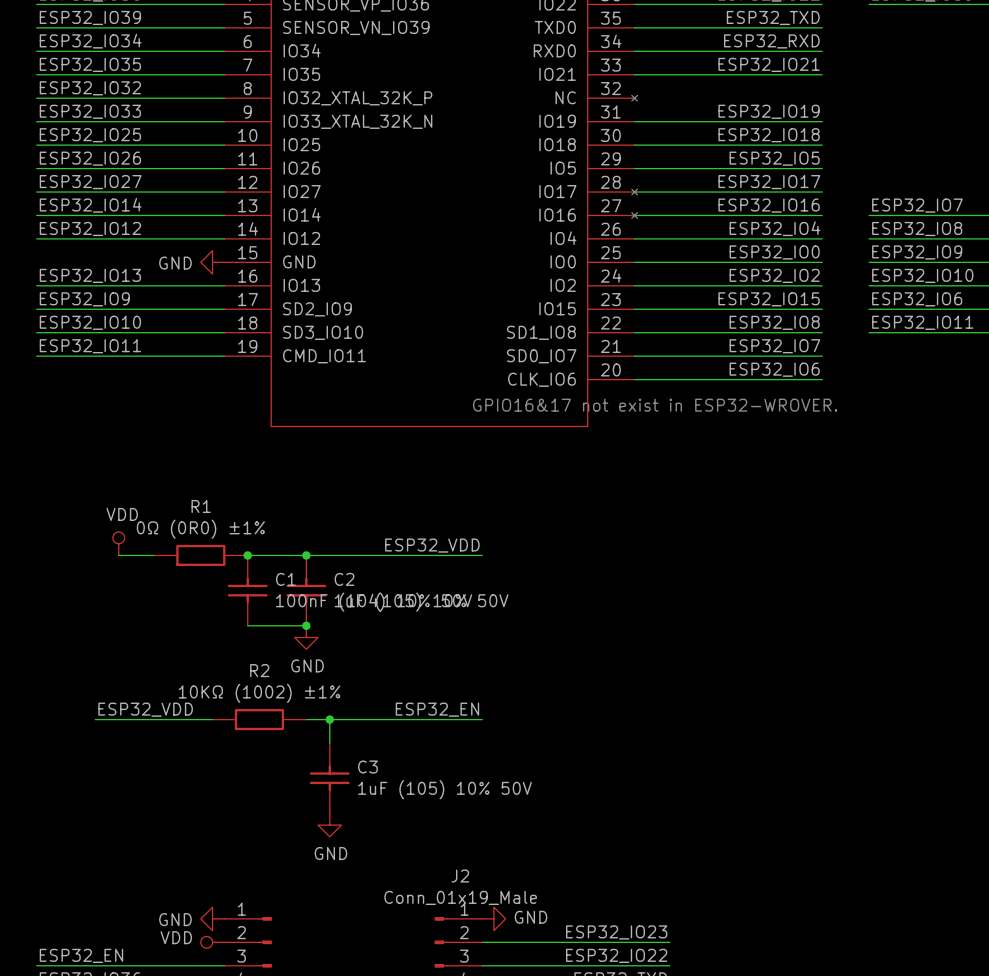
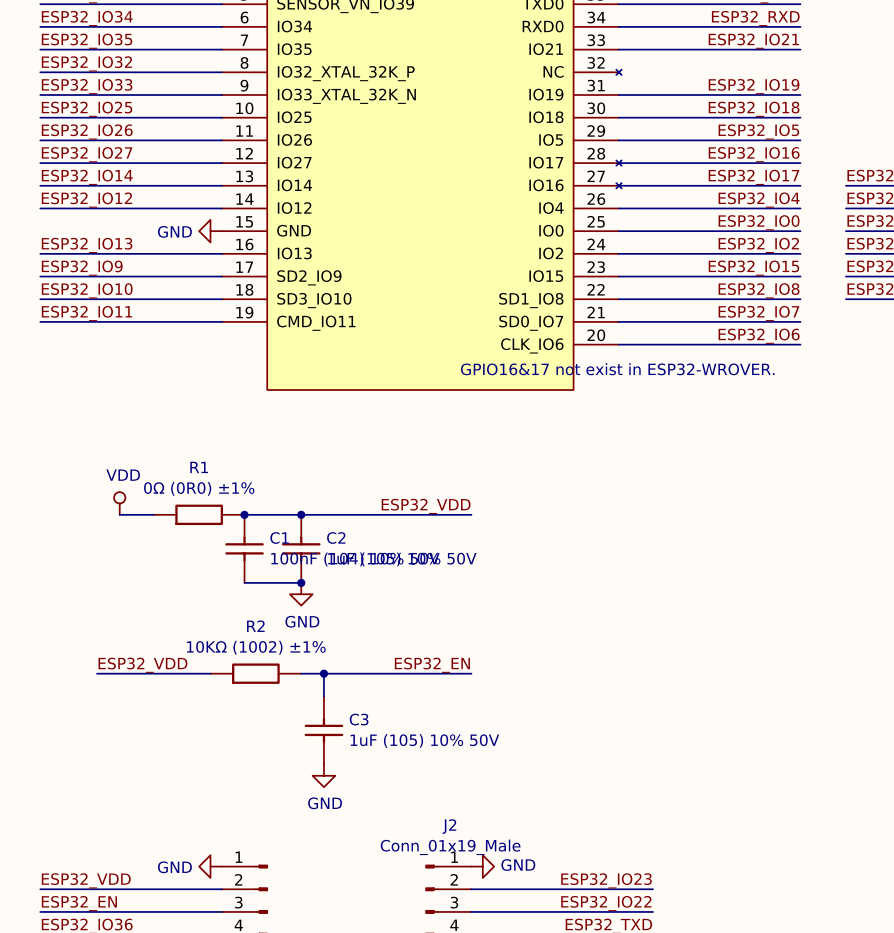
label: ESP32_IO17 (769, 182) -> ESP32_IO16 (754, 154)
label: ESP32_IO16 (769, 205) -> ESP32_IO17 (753, 177)
label: none -> ESP32_VDD (86, 880)
wire: none -> (40, 889) (221, 889)
power symbol: VDD (212, 942) -> none

